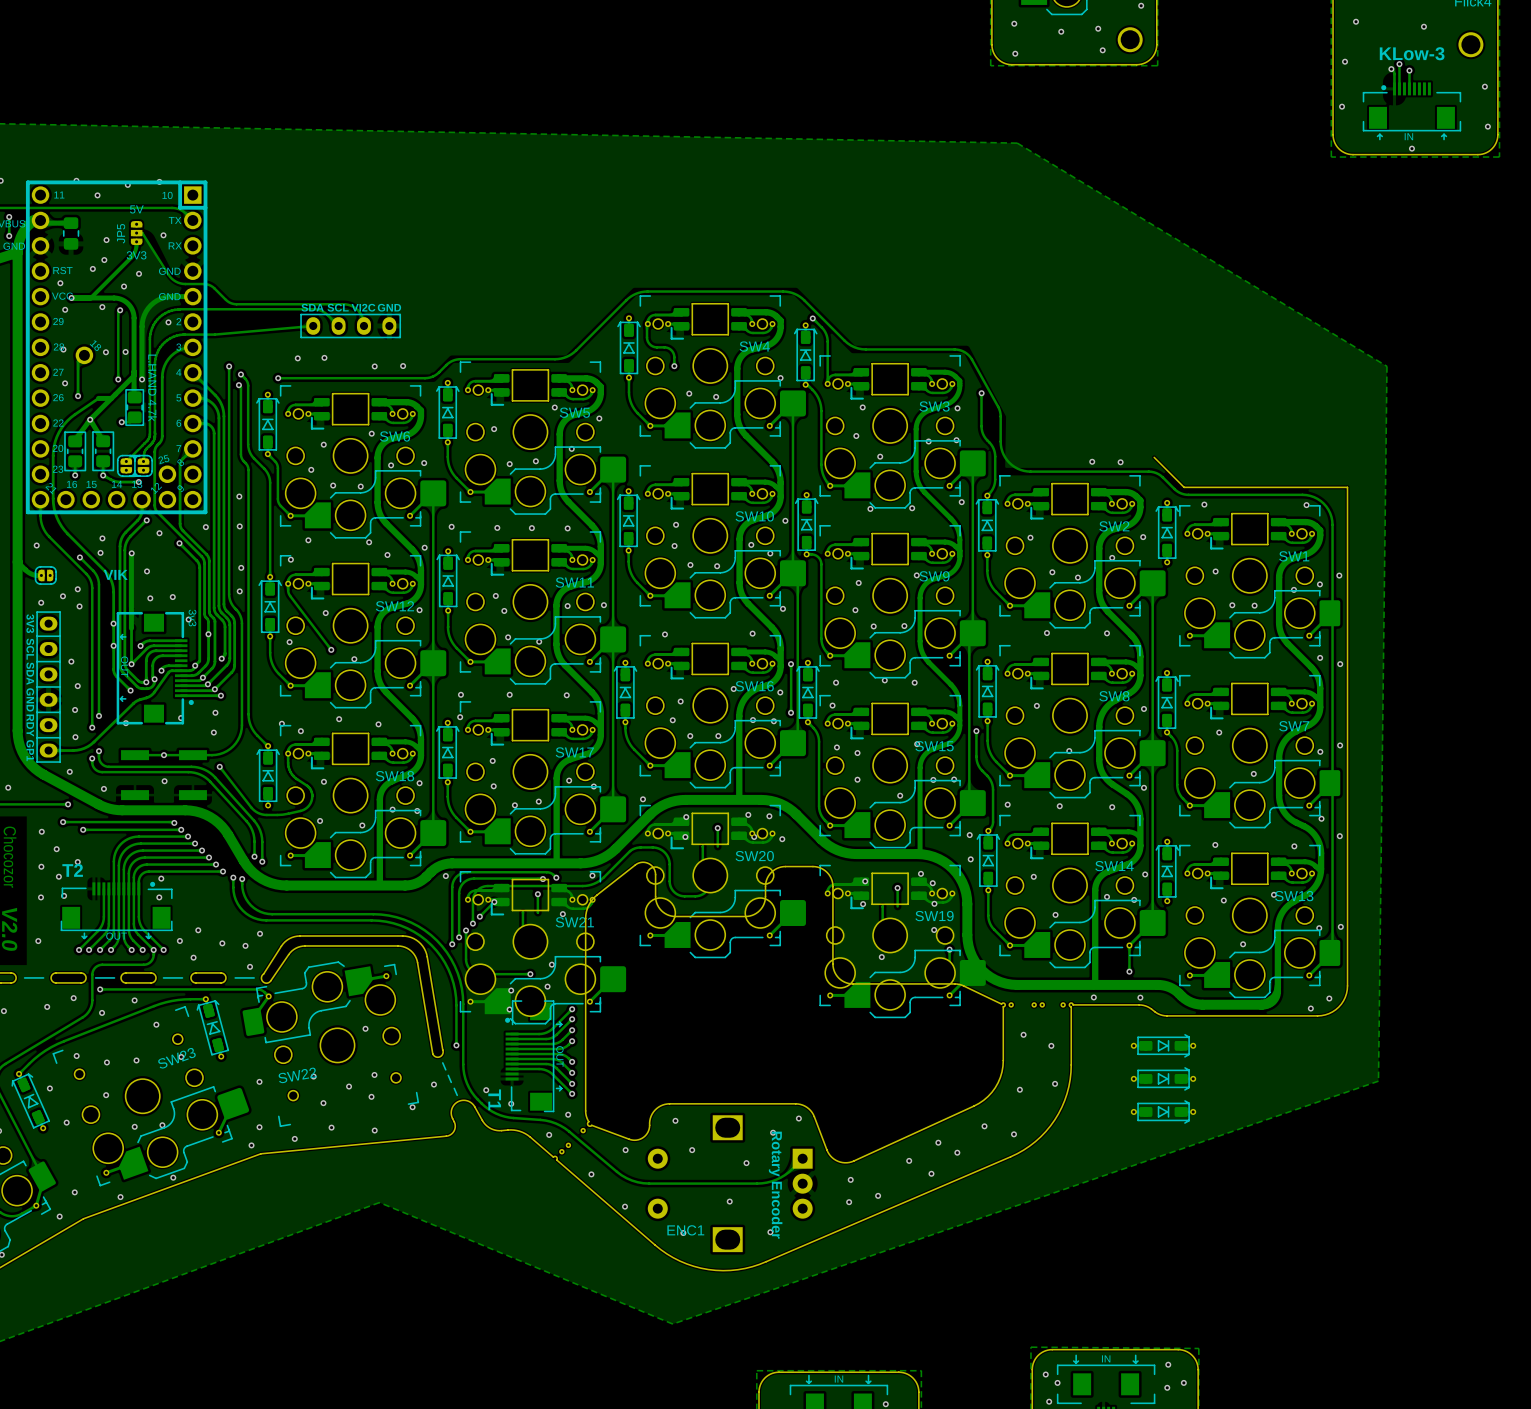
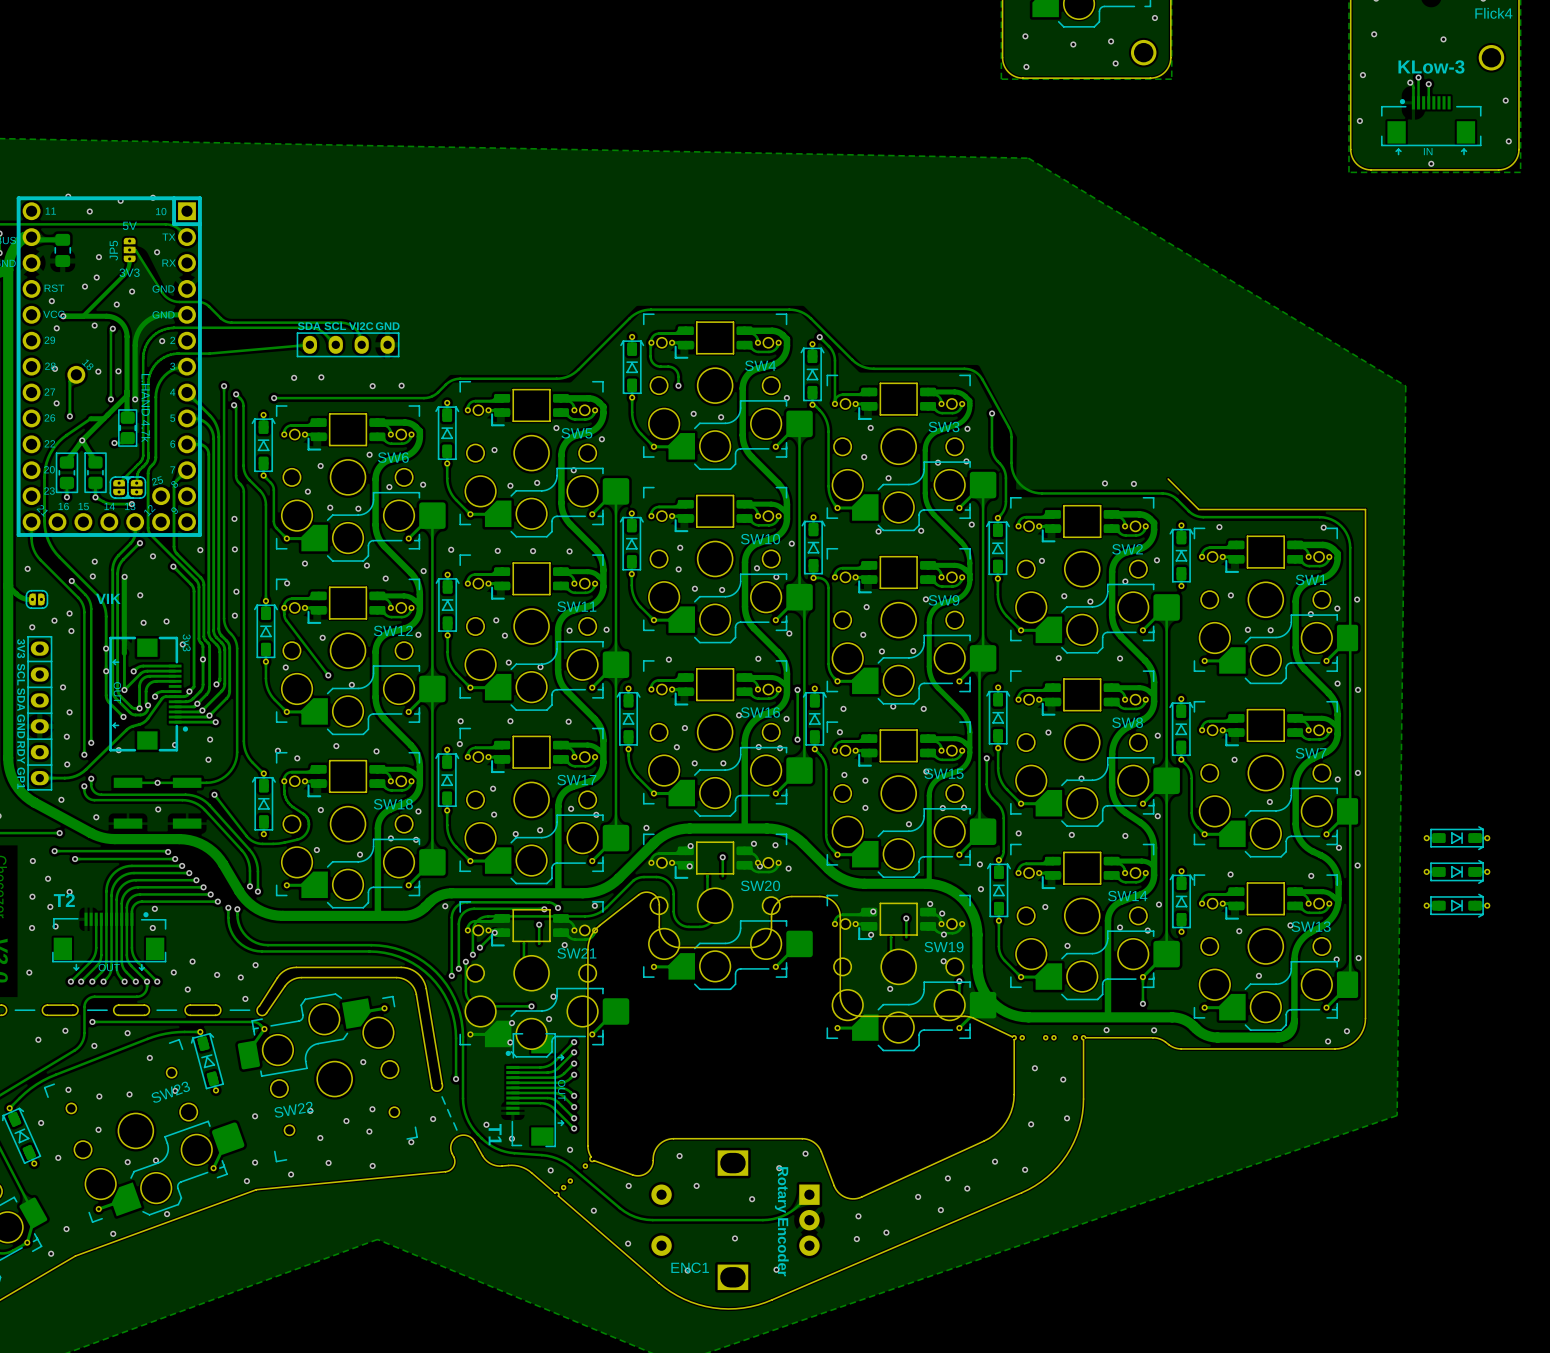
part: none -> (1456, 838)
part: none -> (1456, 871)
part: none -> (1456, 905)
part: (1163, 1045) -> none
part: (1163, 1078) -> none
part: (1163, 1111) -> none

